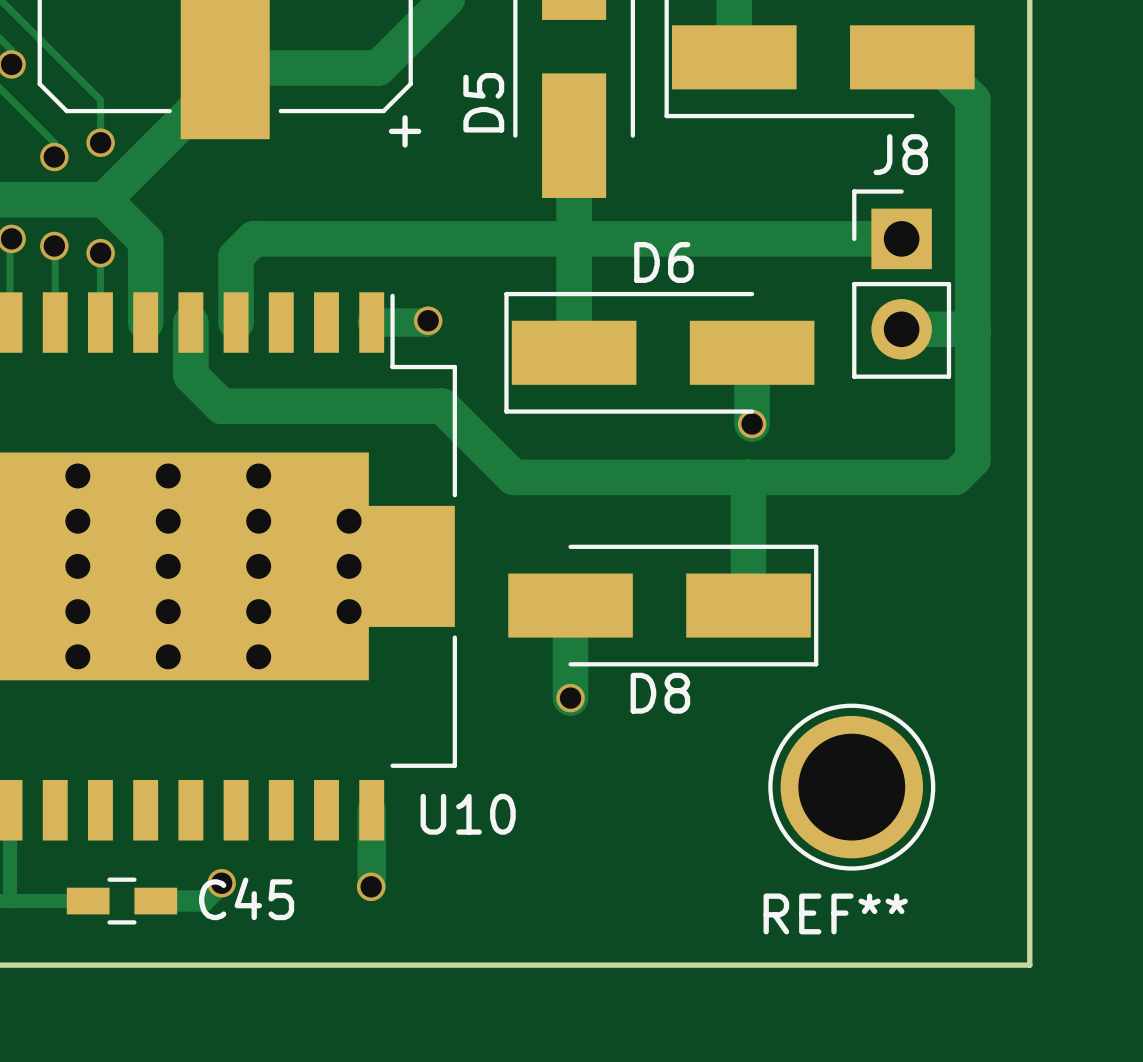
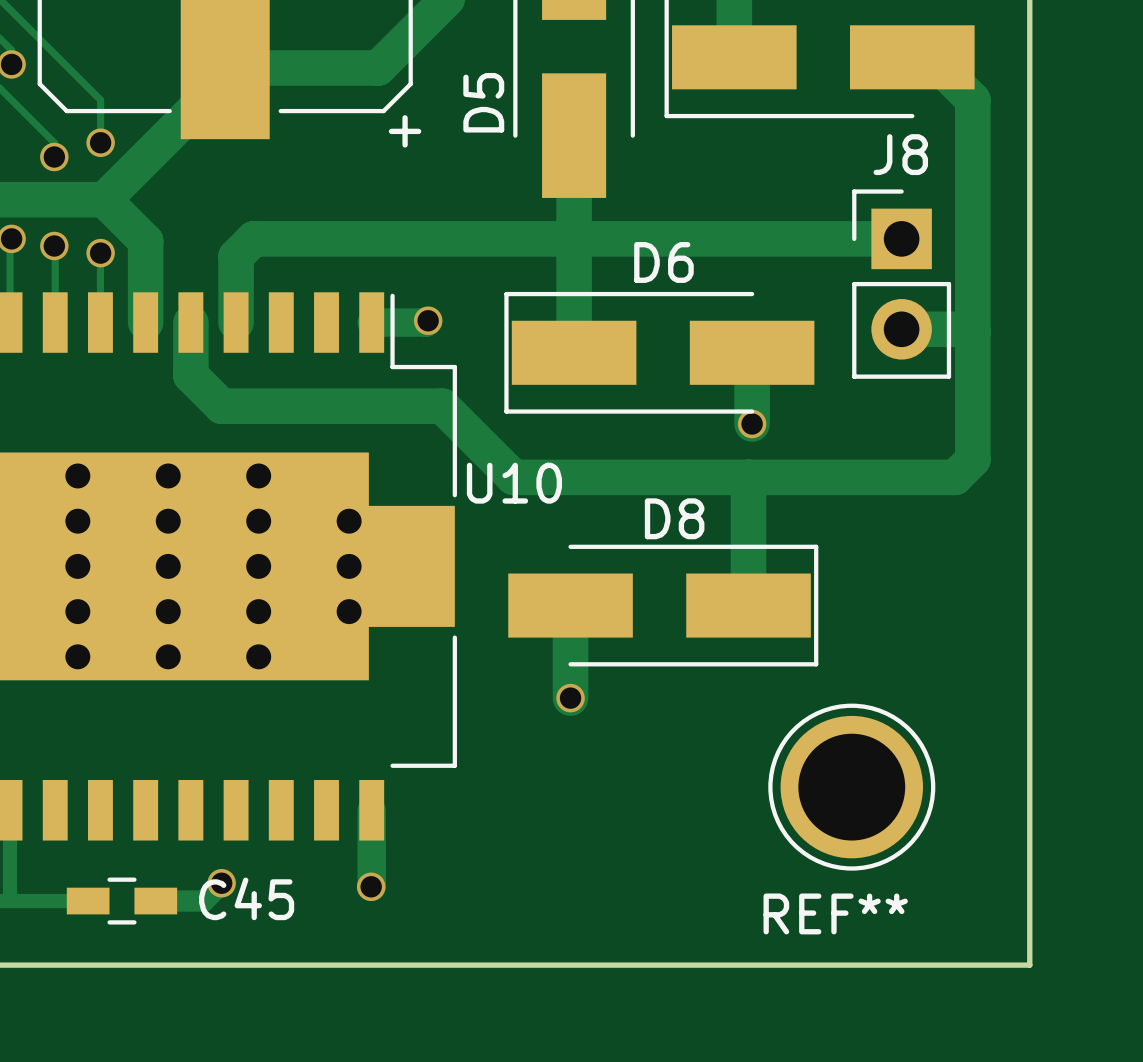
D8 name position: D8 (660, 693) -> D8 (674, 518)
U10 name position: U10 (468, 814) -> U10 (514, 483)

